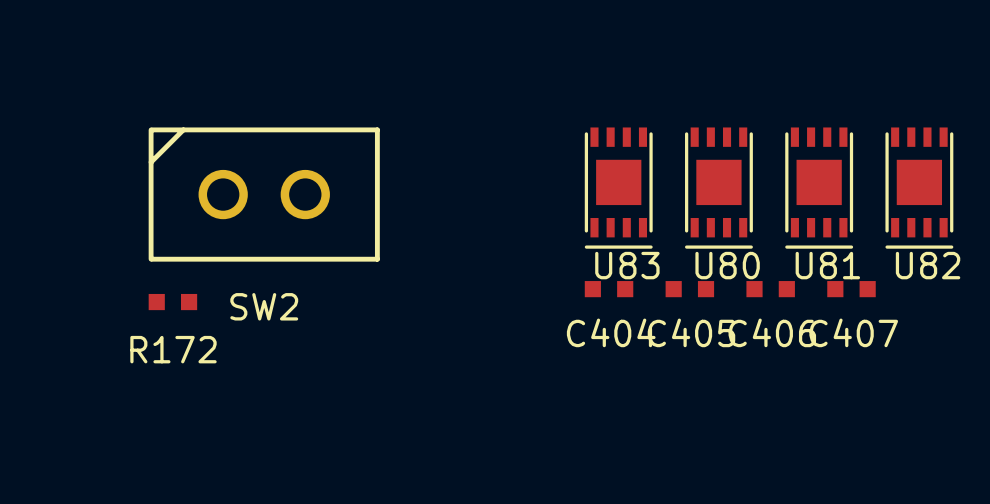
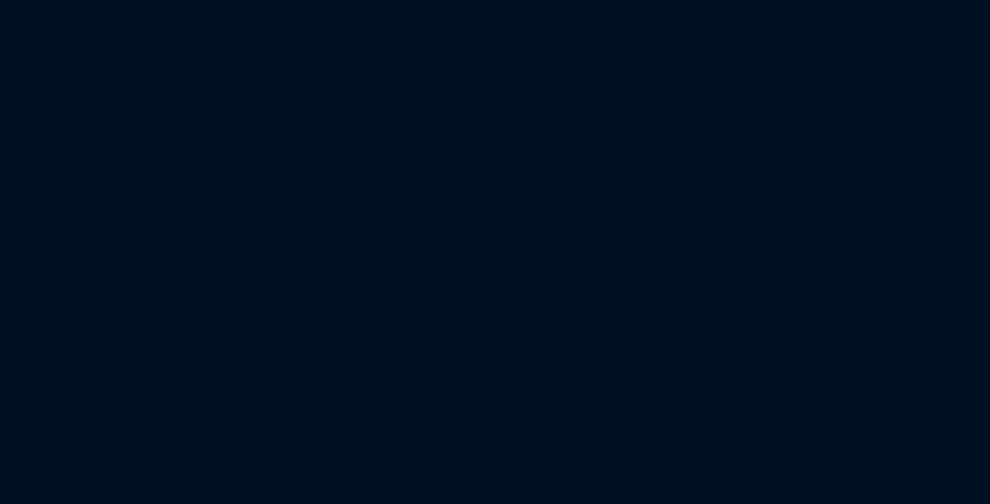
U83: (618, 188) -> none
U80: (718, 188) -> none
U81: (819, 188) -> none
U82: (919, 188) -> none
SW2: (264, 194) -> none
C404: (609, 289) -> none
C405: (689, 289) -> none
C406: (770, 289) -> none
C407: (851, 289) -> none
R172: (172, 302) -> none

